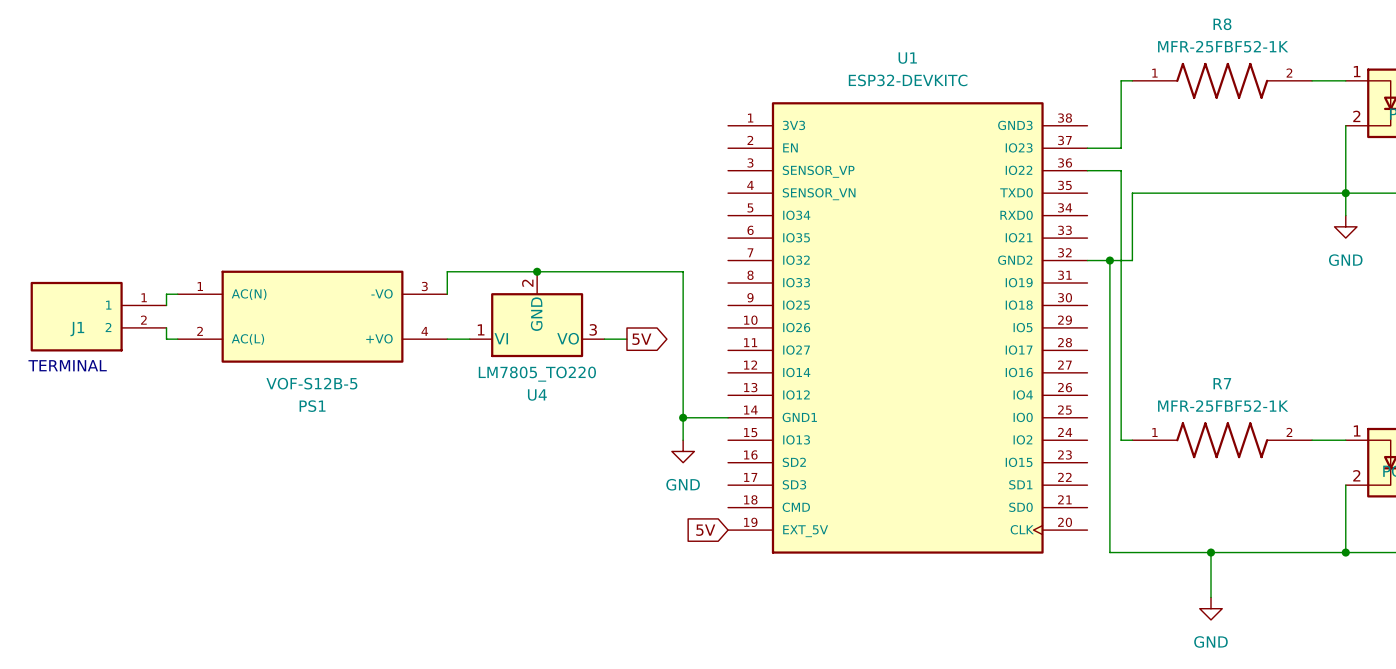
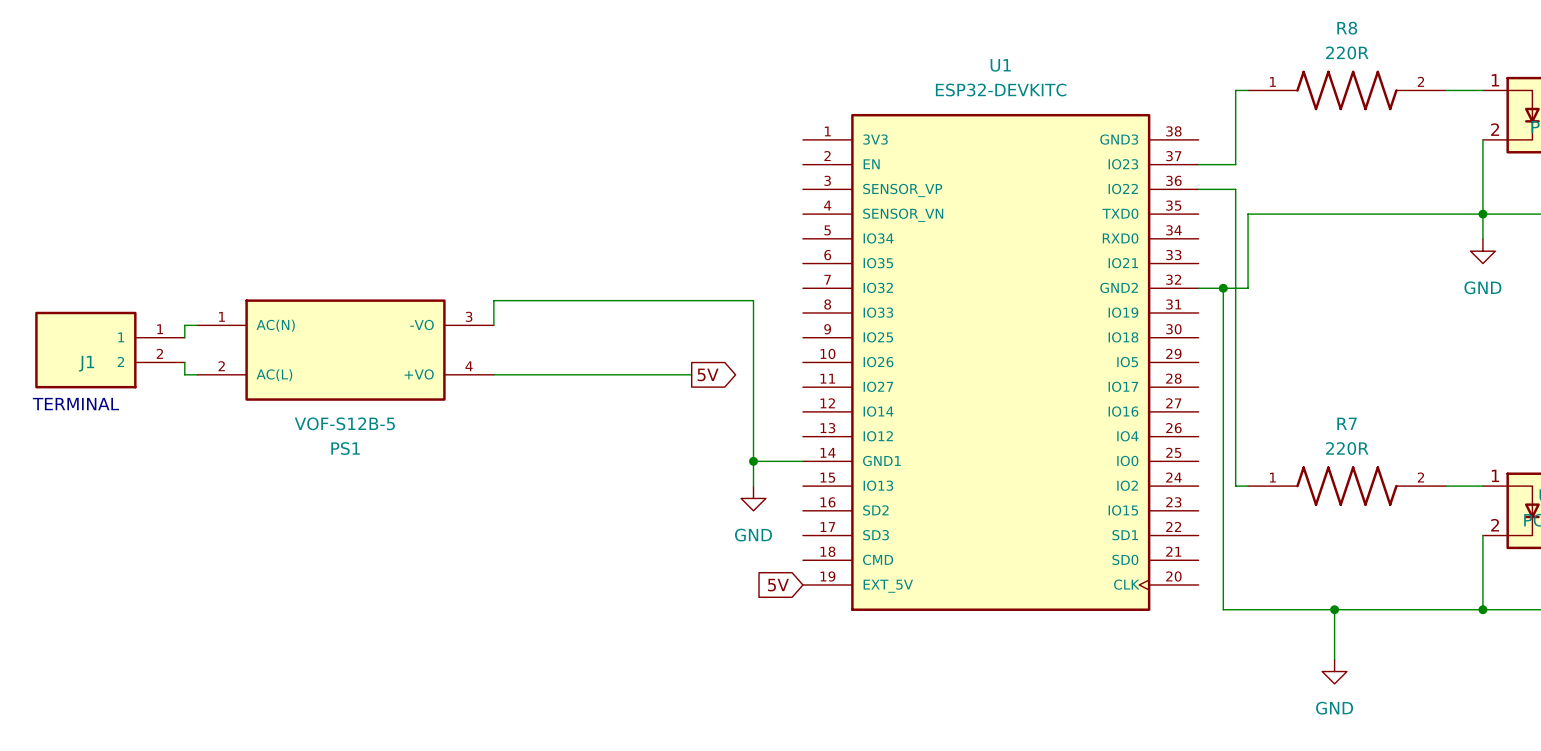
R8 value: MFR-25FBF52-1K (1223, 46) -> 220R (1347, 52)
junction: (537, 271) -> none
U4: LM7805_TO220 (537, 314) -> none
R7 value: MFR-25FBF52-1K (1223, 406) -> 220R (1347, 448)

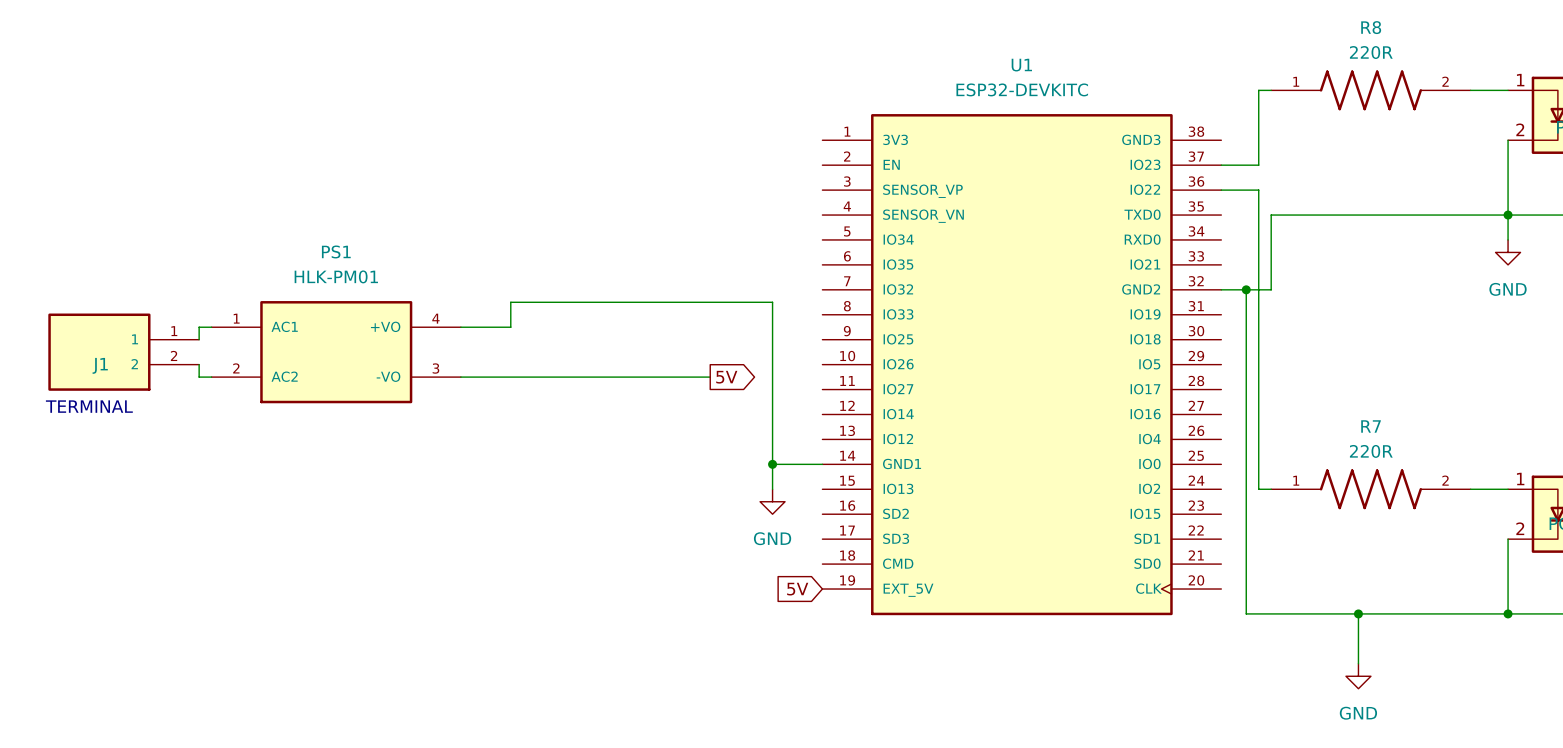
PS1 symbol: [197, 299, 494, 401] -> [211, 301, 461, 404]
PS1 value: VOF-S12B-5 (344, 423) -> HLK-PM01 (336, 276)
PS1 name position: PS1 (345, 448) -> PS1 (336, 251)

